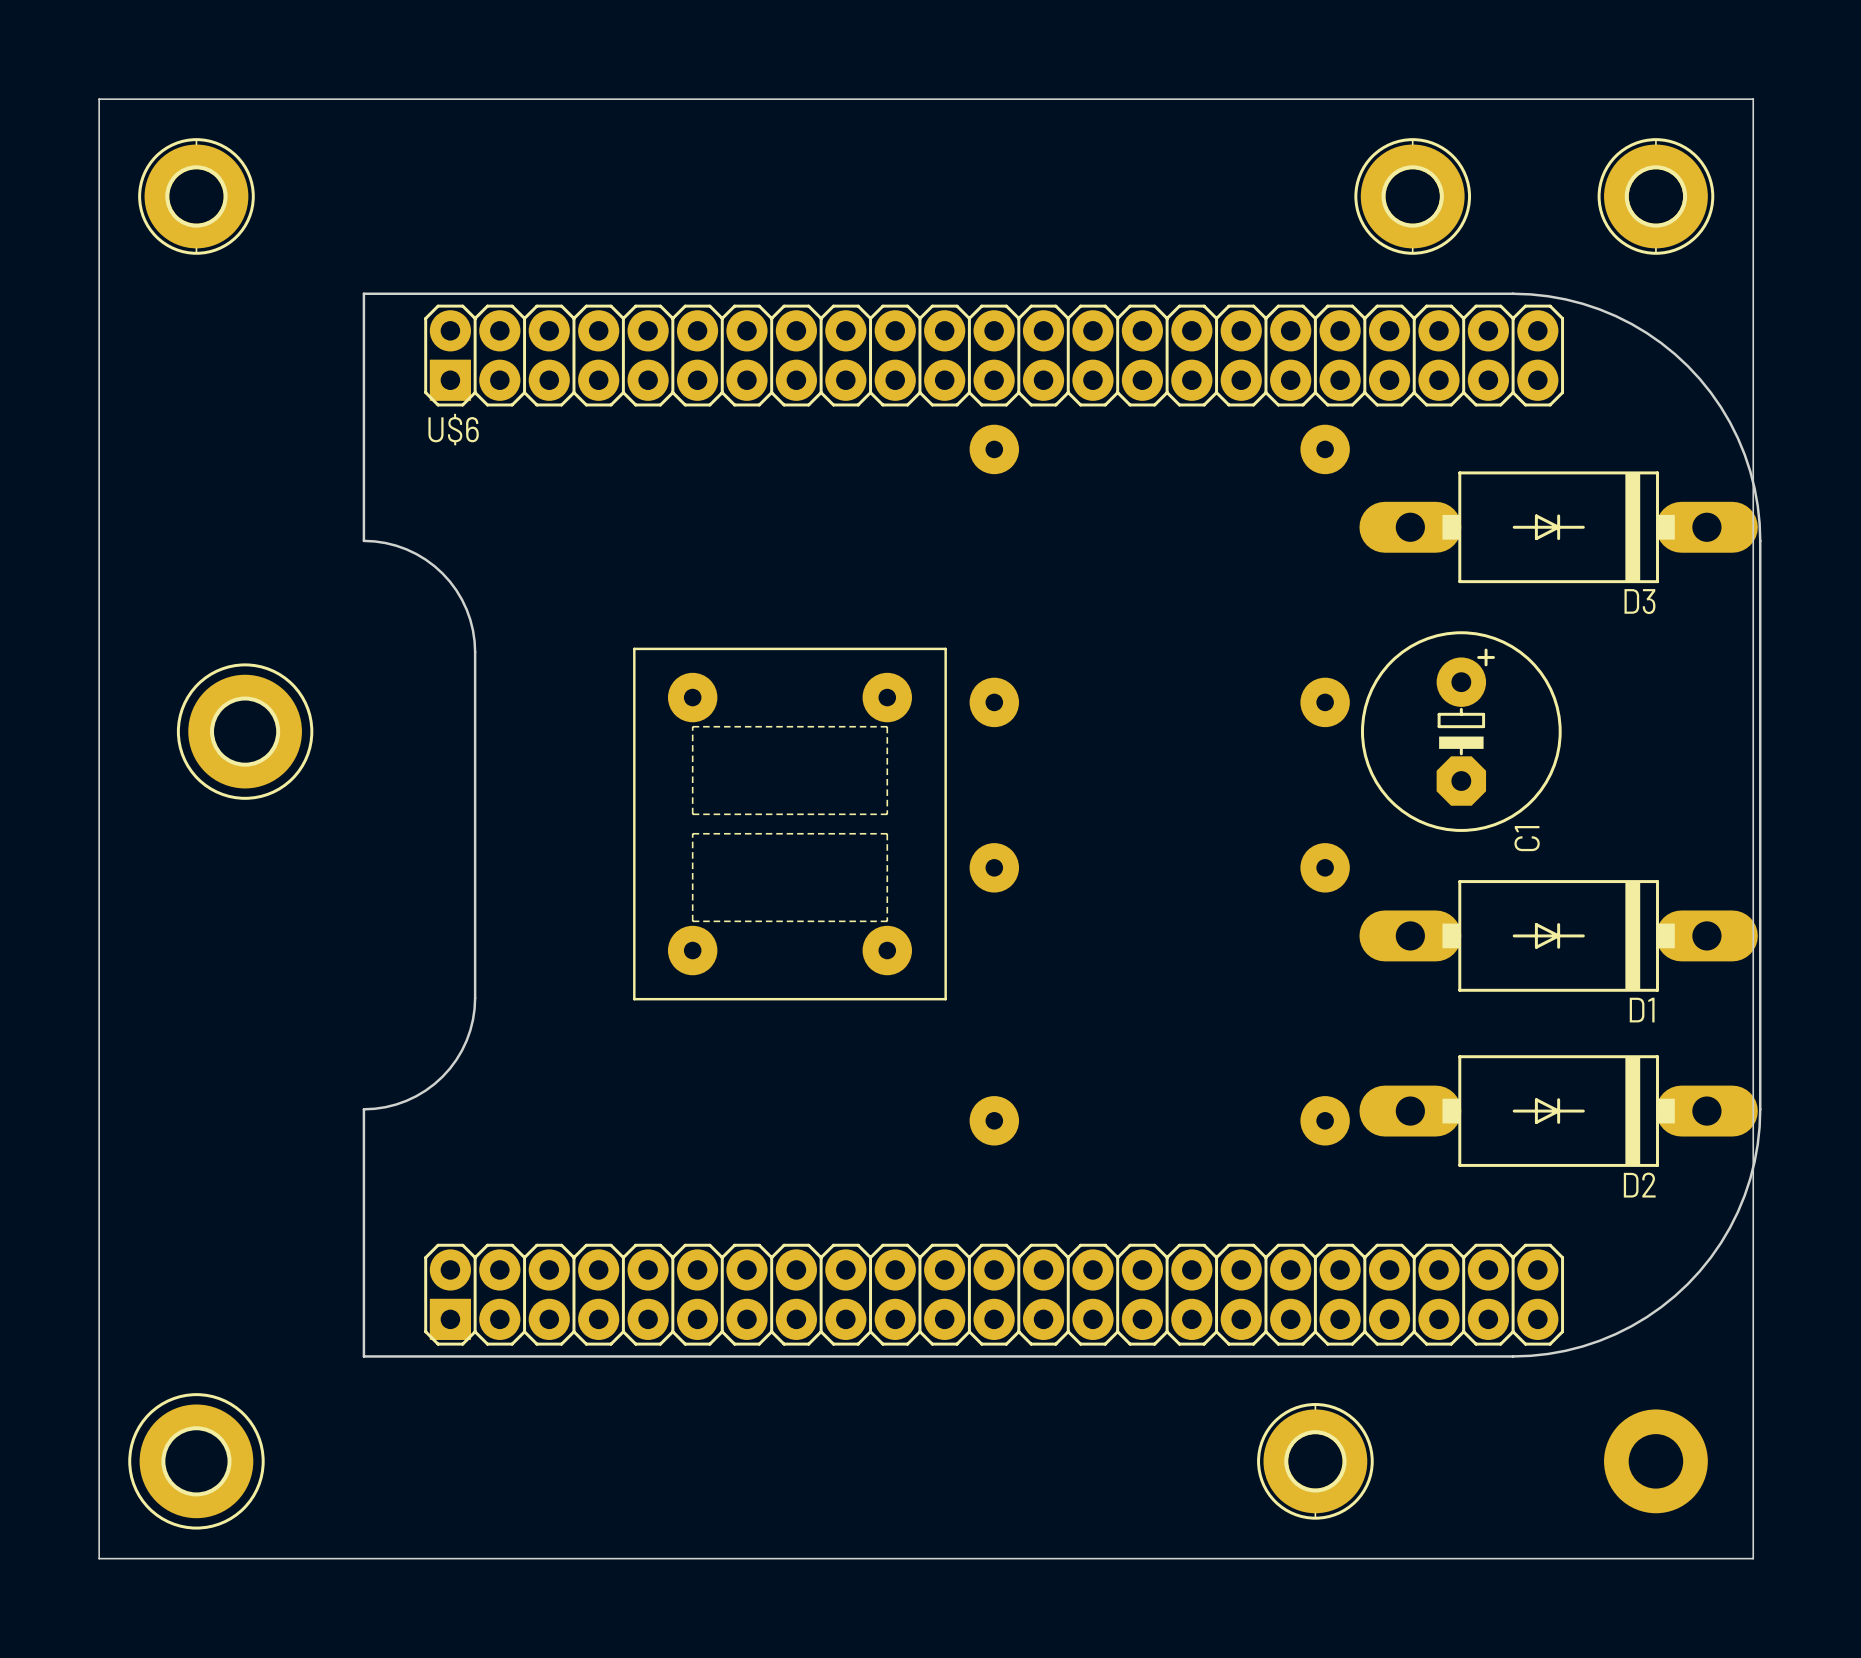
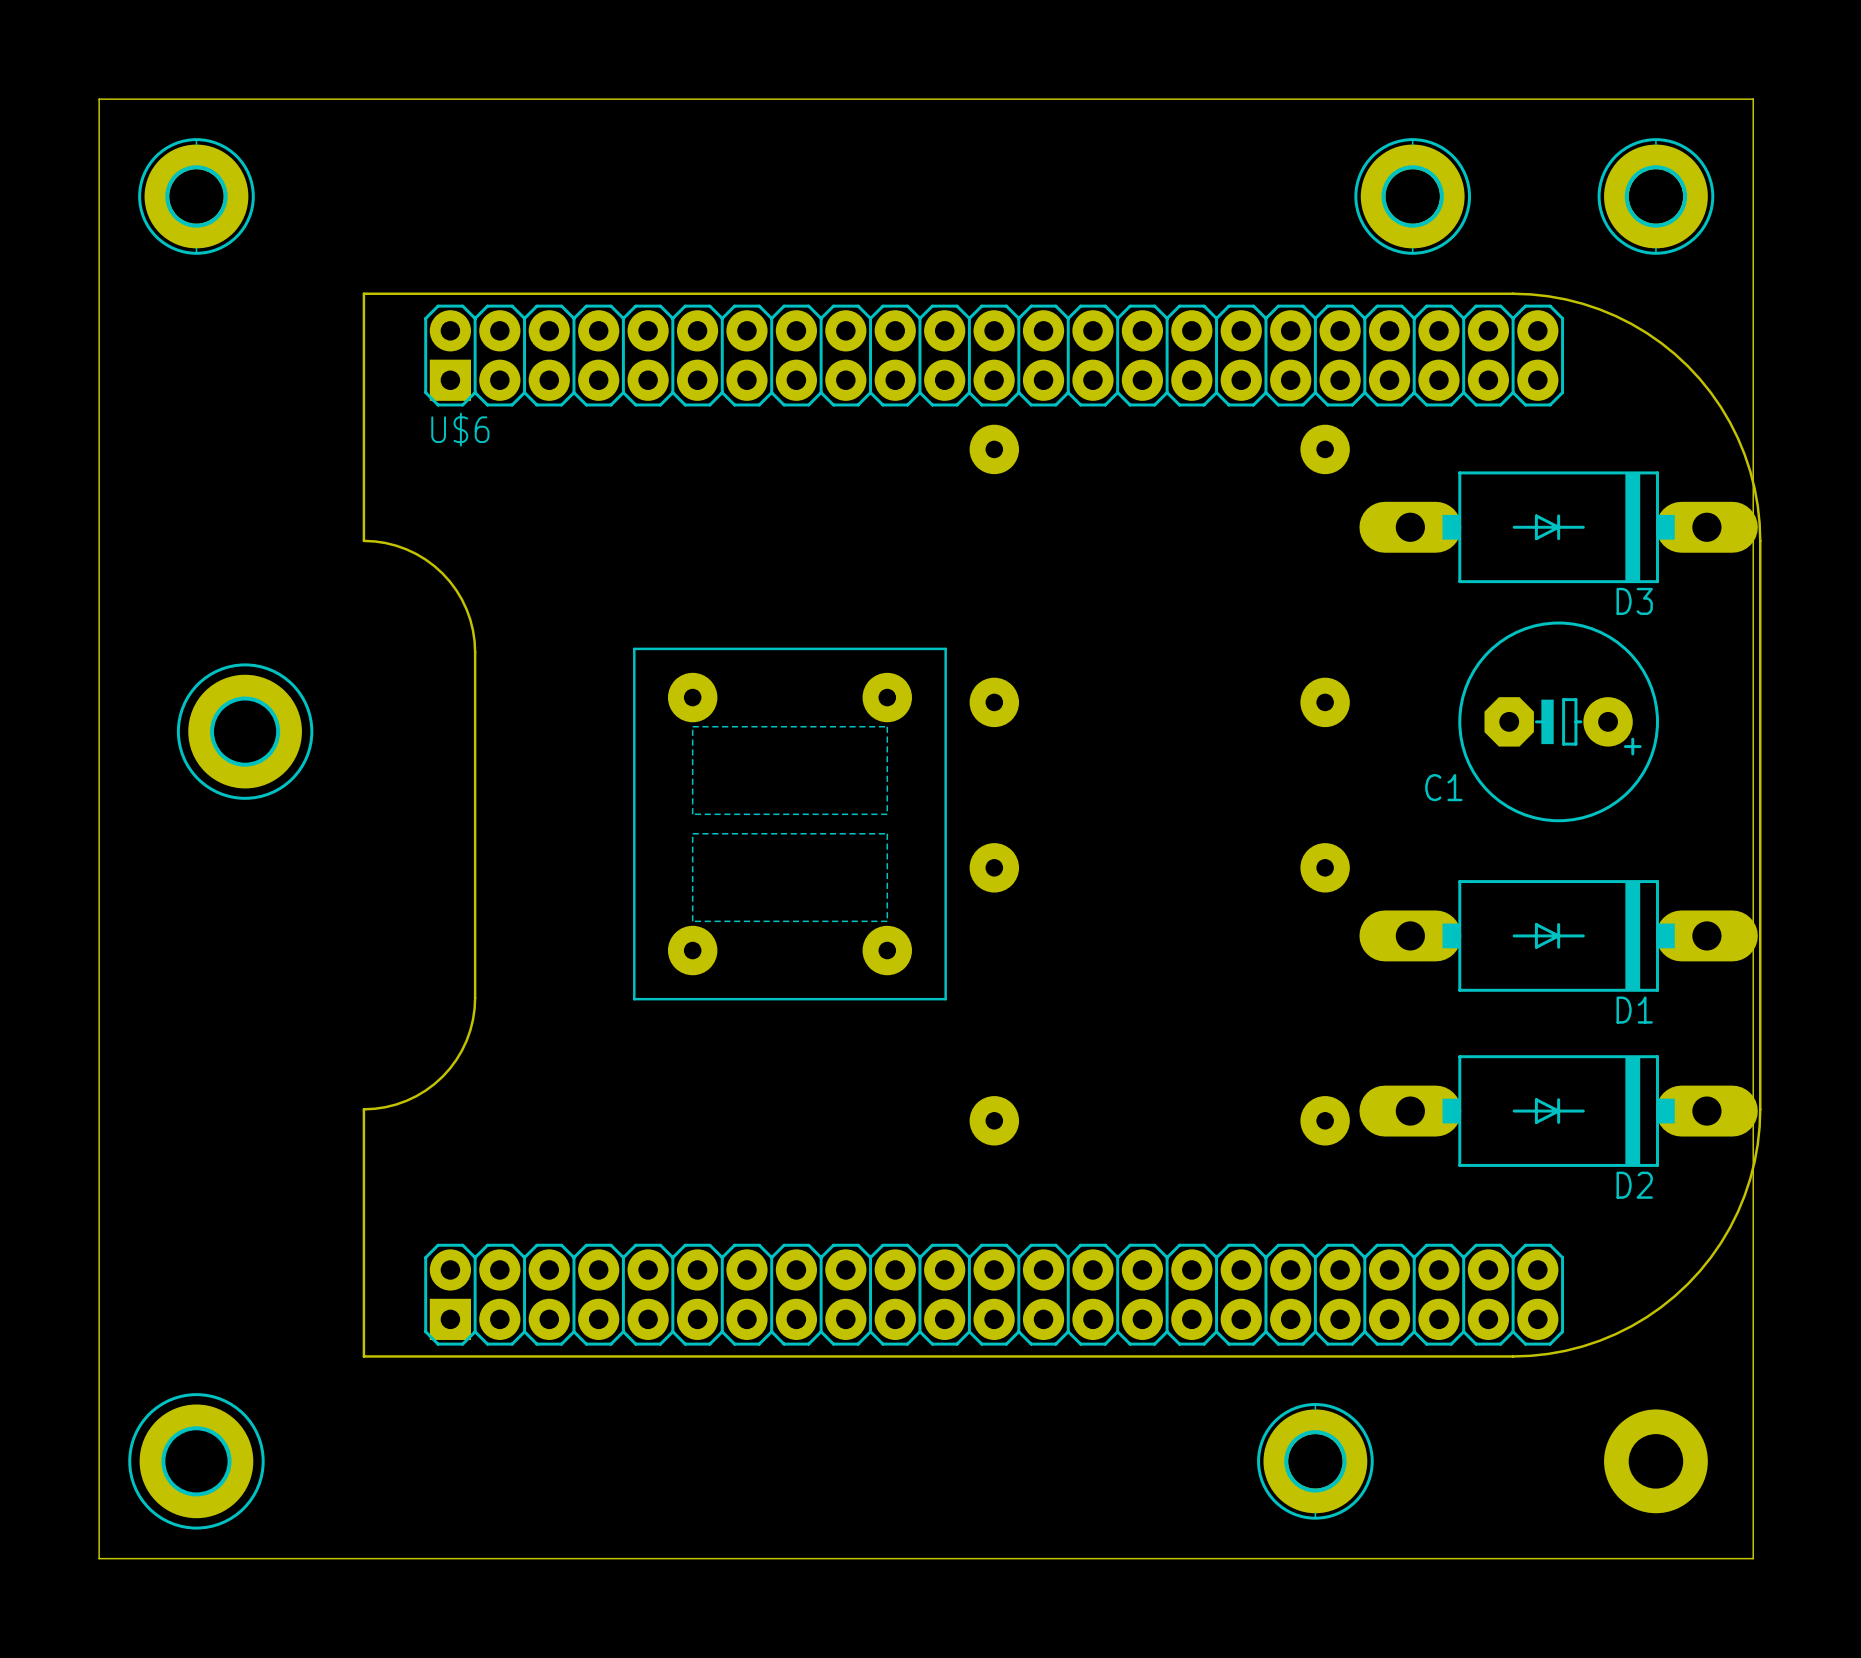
C1 rotation: 0° (1461, 731) -> 90° clockwise (1558, 721)

